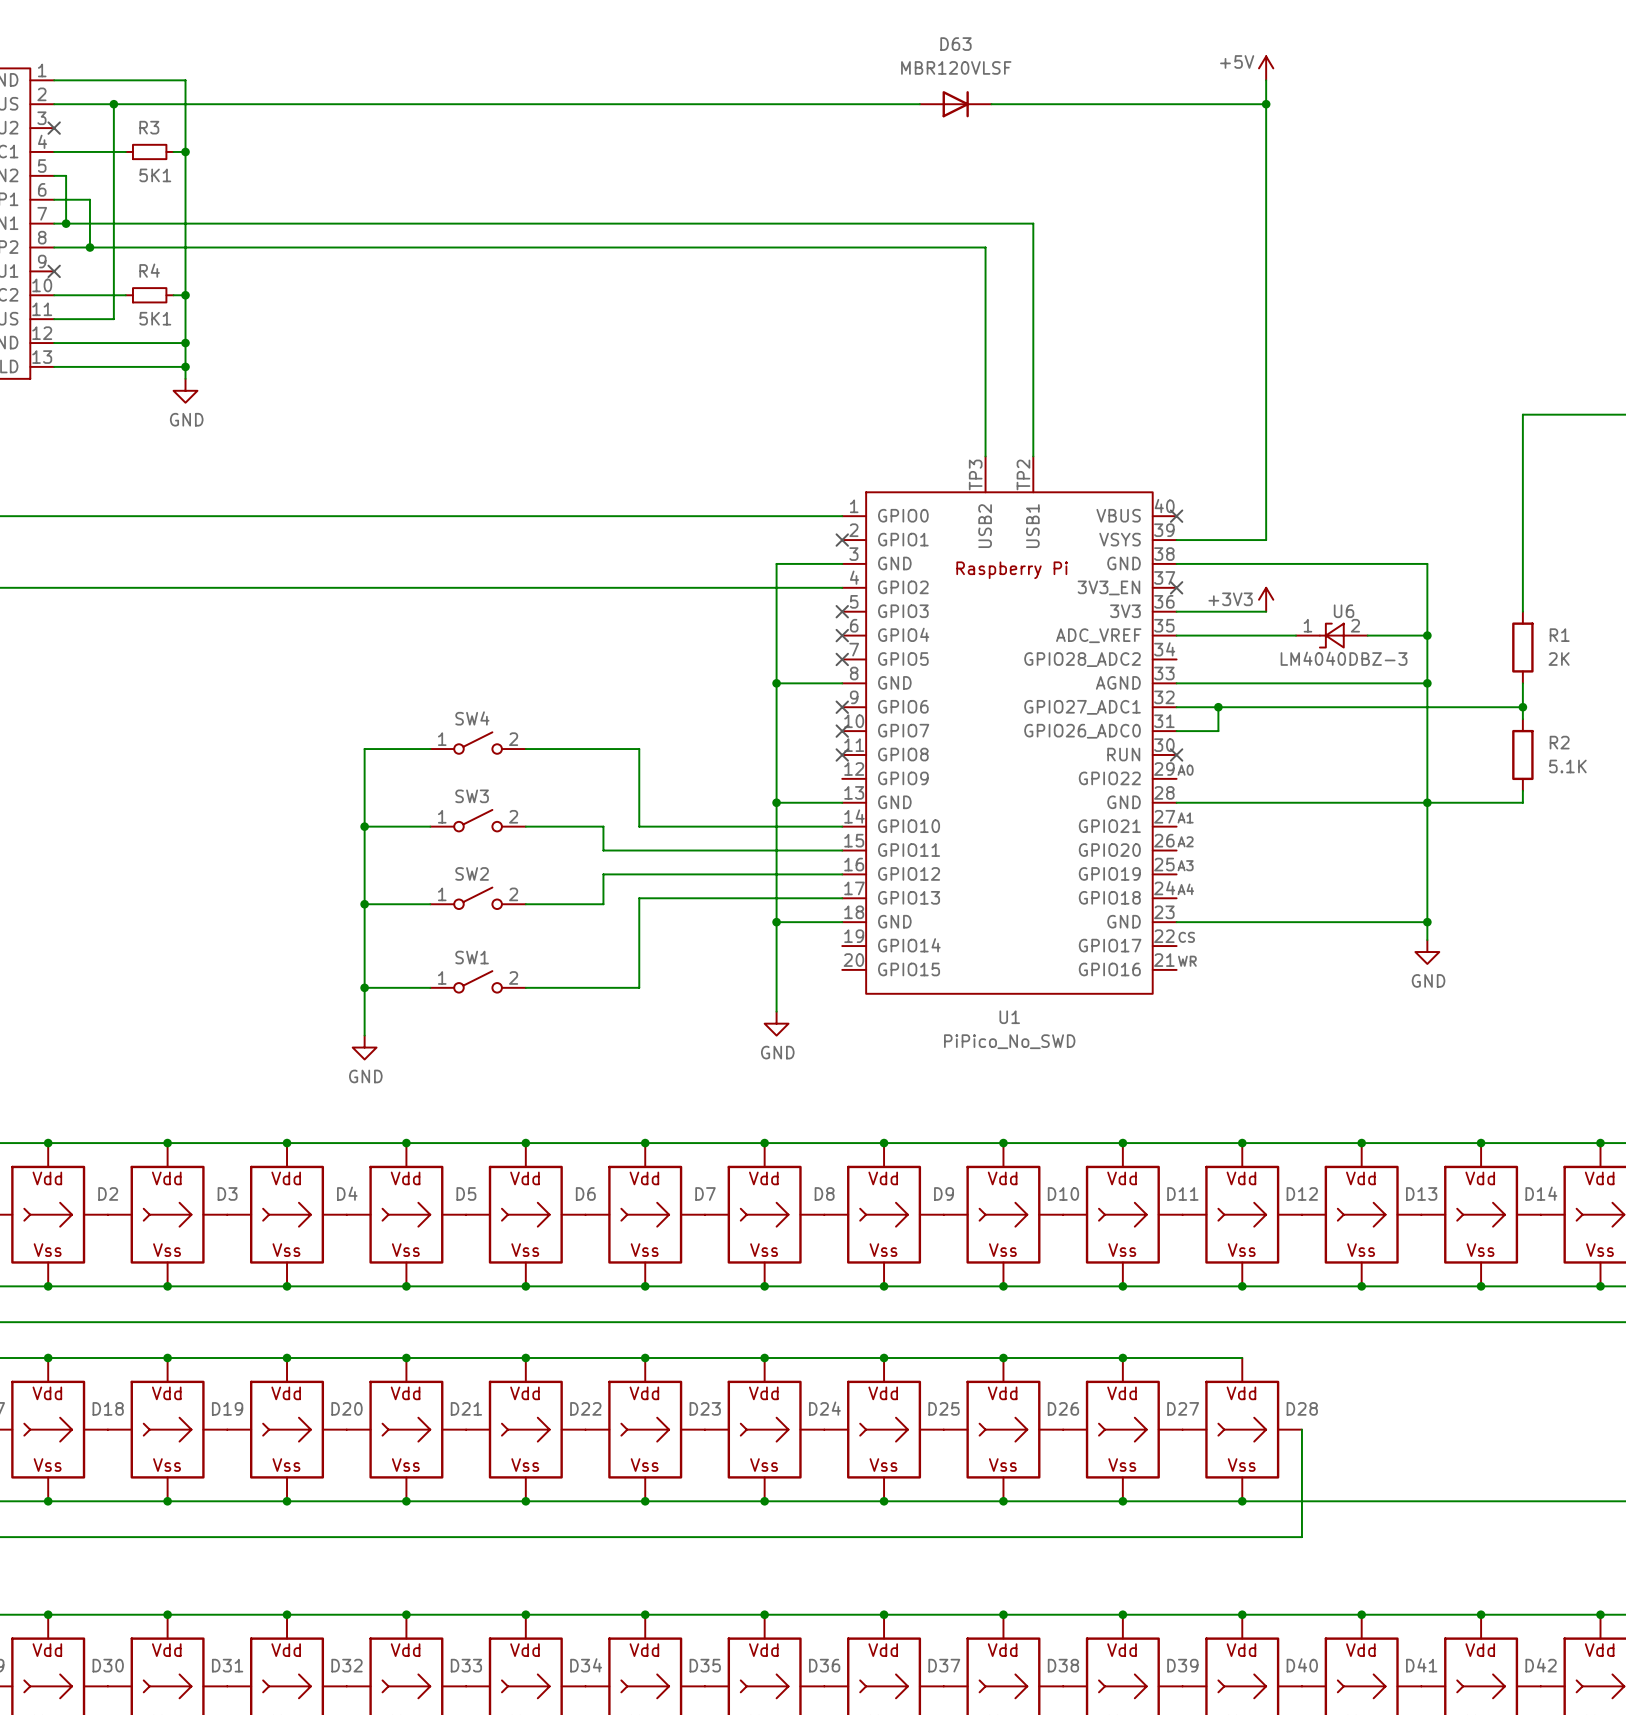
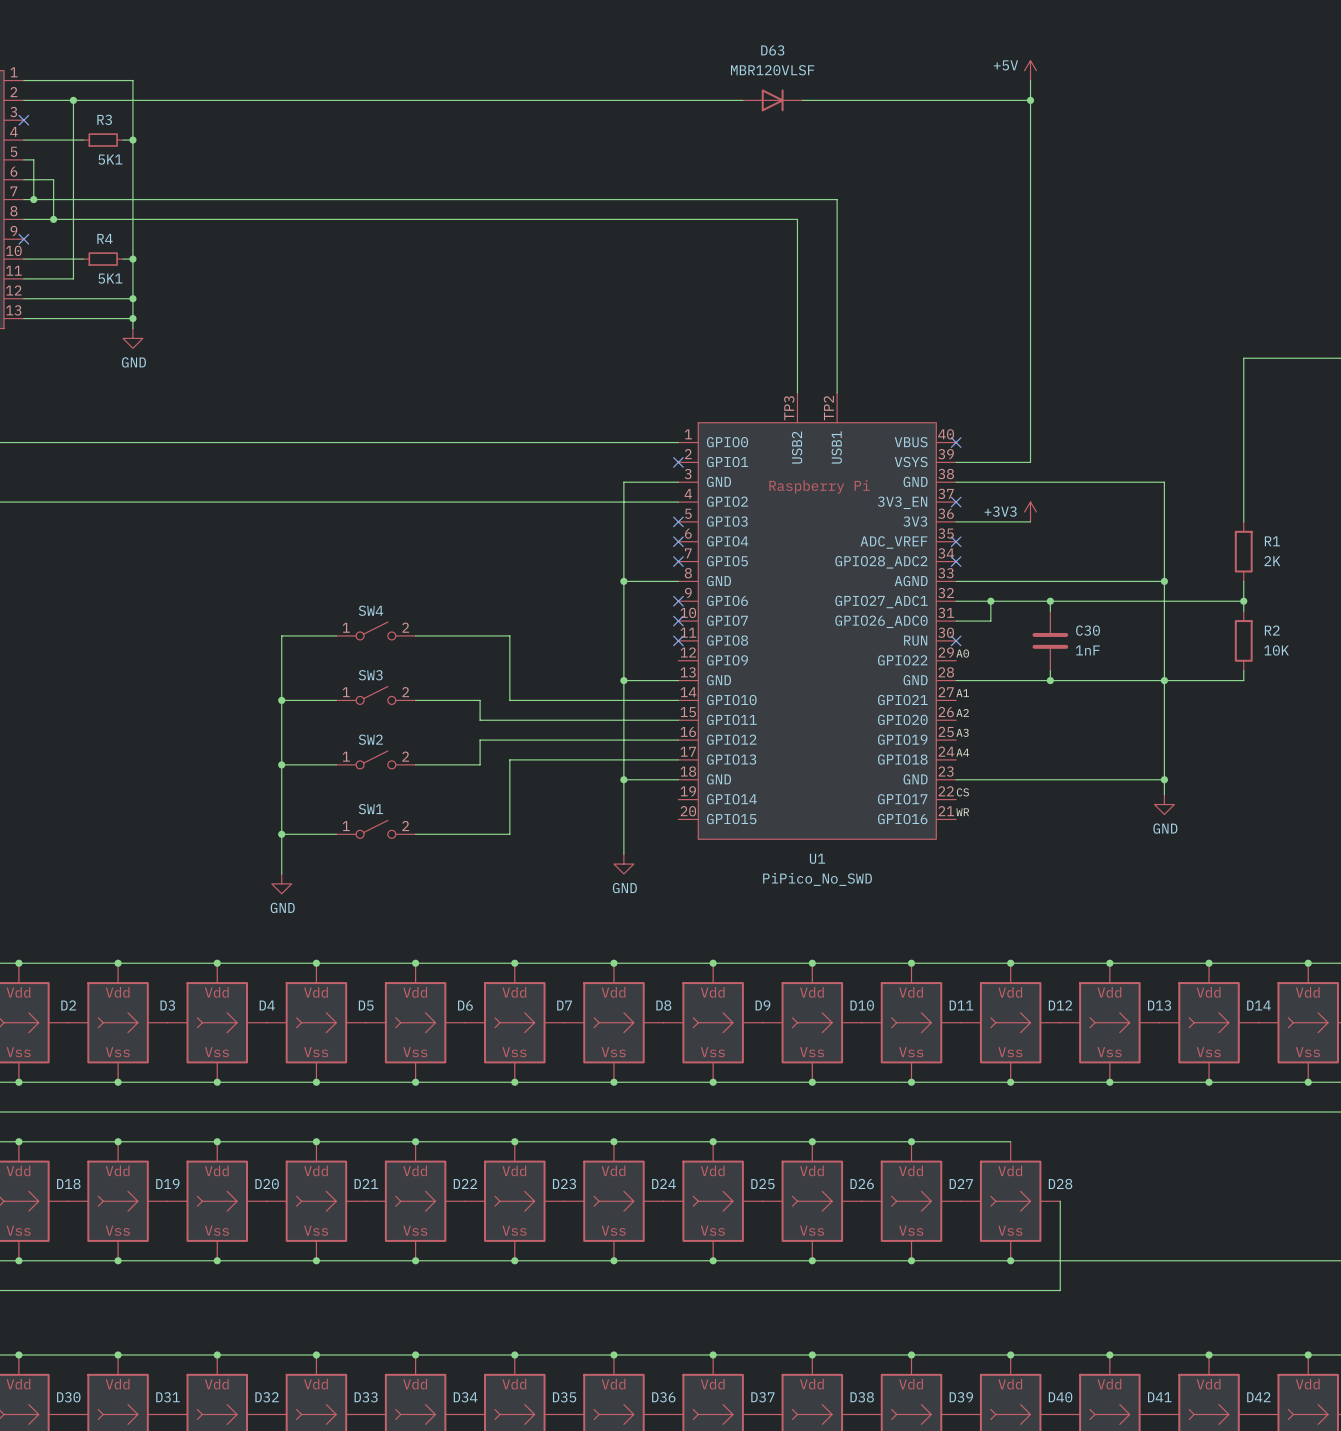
wire: (1176, 635) (1296, 635) -> none
no-connect mark: none -> (956, 541)
U6: LM4040DBZ-3 (1331, 635) -> none
wire: (1367, 635) (1427, 635) -> none
junction: (1427, 635) -> none
no-connect mark: none -> (956, 561)
wire: none -> (1050, 601) (1050, 611)
junction: none -> (1050, 601)
C30: none -> 1nF (1050, 640)
R2 value: 5.1K (1567, 766) -> 10K (1276, 650)
wire: none -> (1050, 670) (1050, 680)
junction: none -> (1050, 680)

